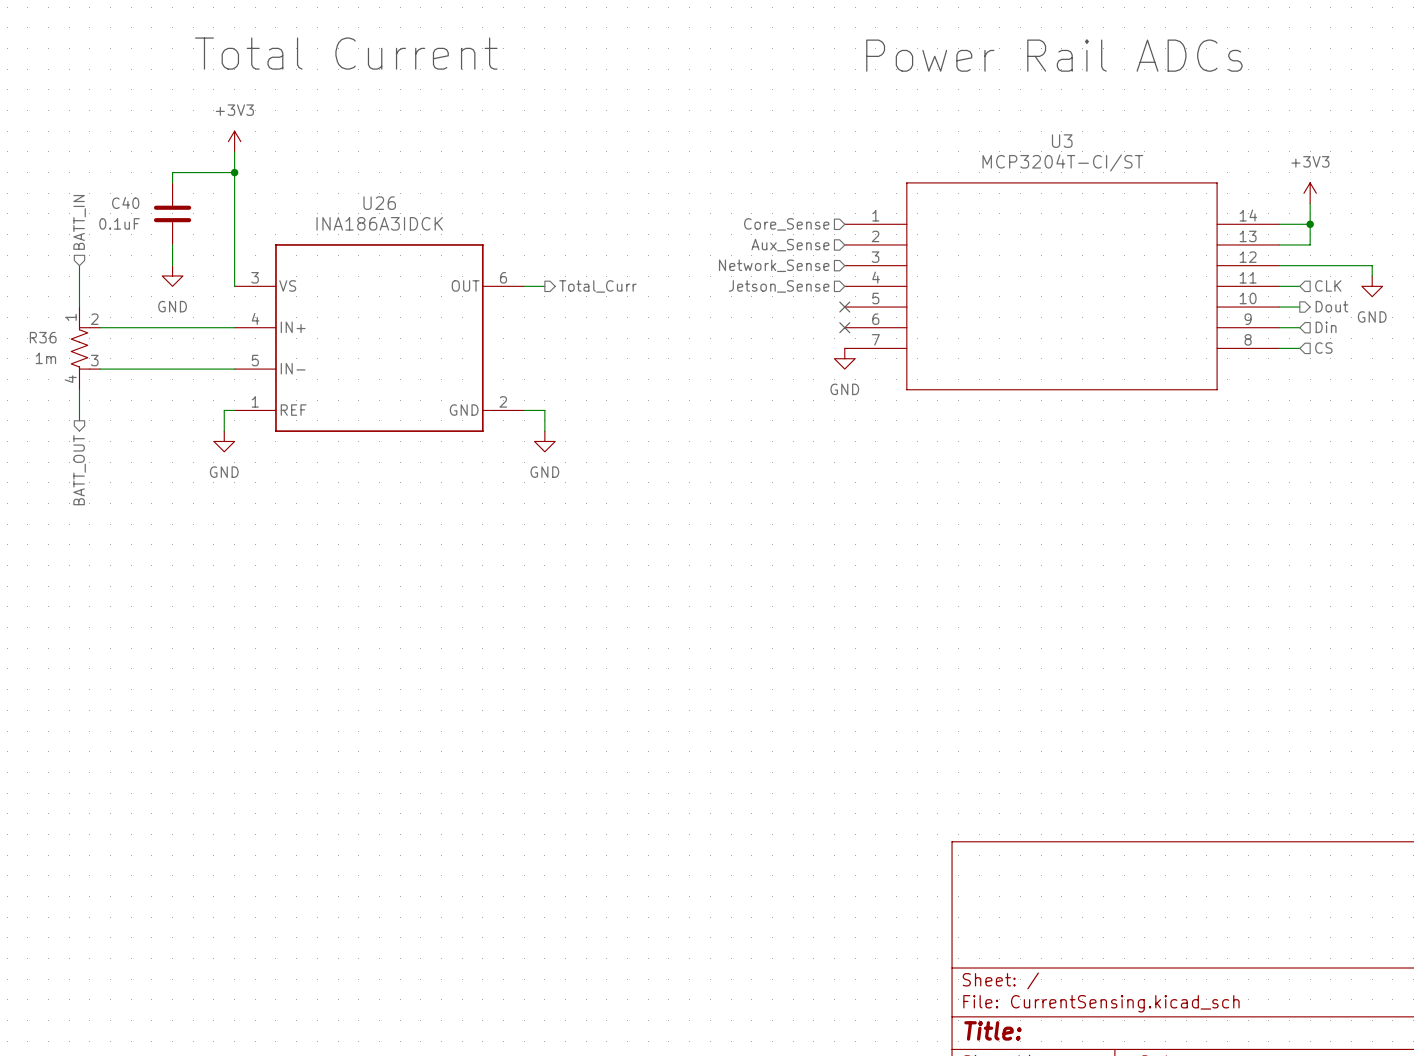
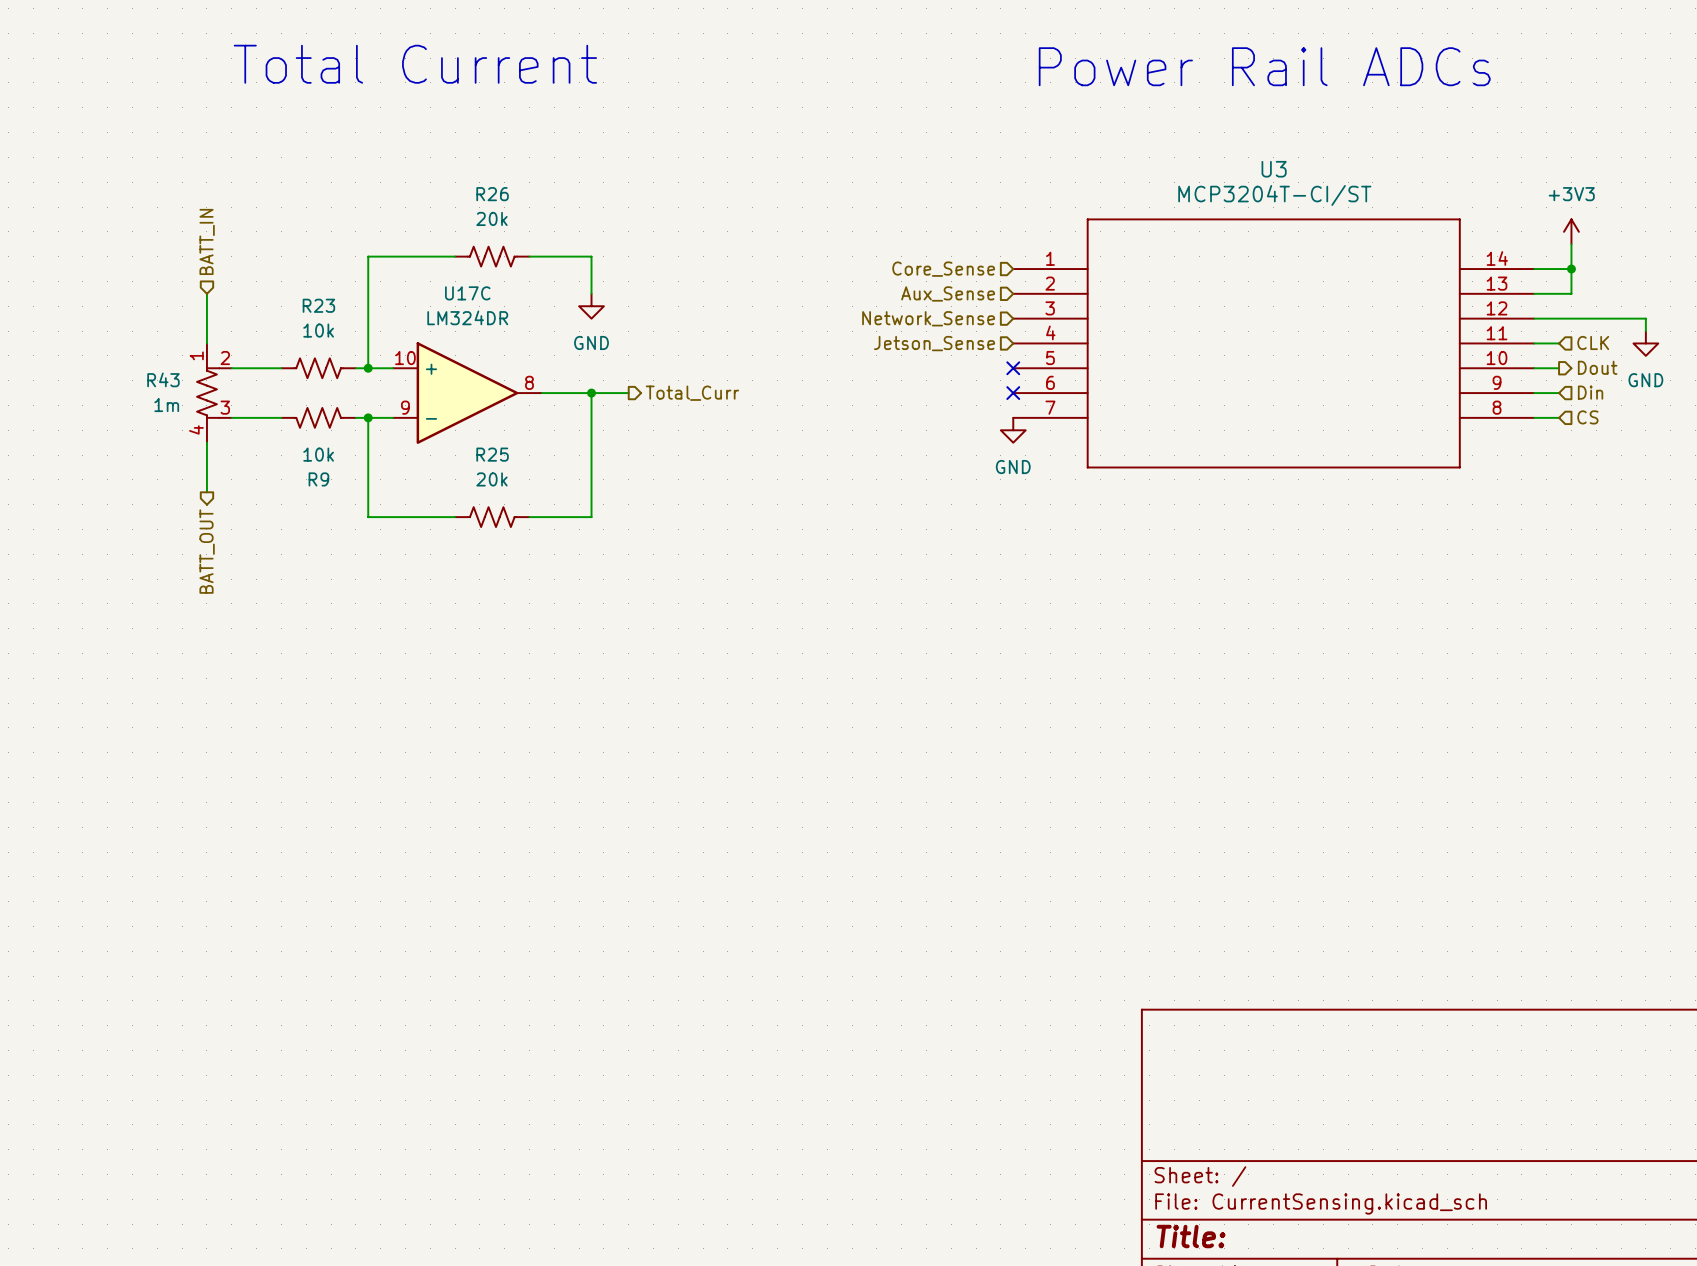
power symbol: +3V3 (234, 141) -> none
wire: (234, 151) (234, 286) -> none
wire: (234, 172) (172, 172) (172, 182) -> none
junction: (234, 172) -> none
C40: 0.1uF (172, 213) -> none
wire: none -> (455, 256) (368, 256) (368, 368)
R26: none -> 20k (492, 256)
wire: none -> (529, 256) (591, 256) (591, 293)
hierarchical label position: BATT_IN (79, 222) -> BATT_IN (207, 241)
power symbol: none -> GND (591, 306)
wire: (79, 265) (79, 307) -> (206, 442) (206, 492)
power symbol: GND (172, 276) -> none
wire: (524, 286) (544, 286) -> none
hierarchical label position: Total_Curr (597, 286) -> Total_Curr (692, 393)
wire: none -> (231, 368) (281, 368)
R23: none -> 10k (318, 368)
wire: none -> (355, 368) (393, 368)
junction: none -> (368, 368)
wire: (100, 327) (234, 327) -> none
R43: none -> 1m (214, 393)
U17C: none -> LM324DR (467, 393)
wire: none -> (541, 393) (628, 393)
wire: none -> (591, 393) (591, 517) (529, 517)
junction: none -> (591, 393)
U26: INA186A3IDCK (379, 338) -> none
R36: 1m (85, 348) -> none
wire: none -> (231, 417) (281, 417)
R9: none -> 10k (318, 417)
wire: none -> (355, 417) (393, 417)
wire: none -> (368, 417) (368, 517) (455, 517)
junction: none -> (368, 417)
wire: (100, 369) (234, 369) -> none
wire: (79, 389) (79, 420) -> none
wire: (234, 410) (224, 410) (224, 431) -> none
wire: (524, 410) (544, 410) (544, 431) -> none
R25: none -> 20k (492, 517)
power symbol: GND (224, 441) -> none
power symbol: GND (544, 441) -> none
hierarchical label position: BATT_OUT (79, 470) -> BATT_OUT (207, 551)

